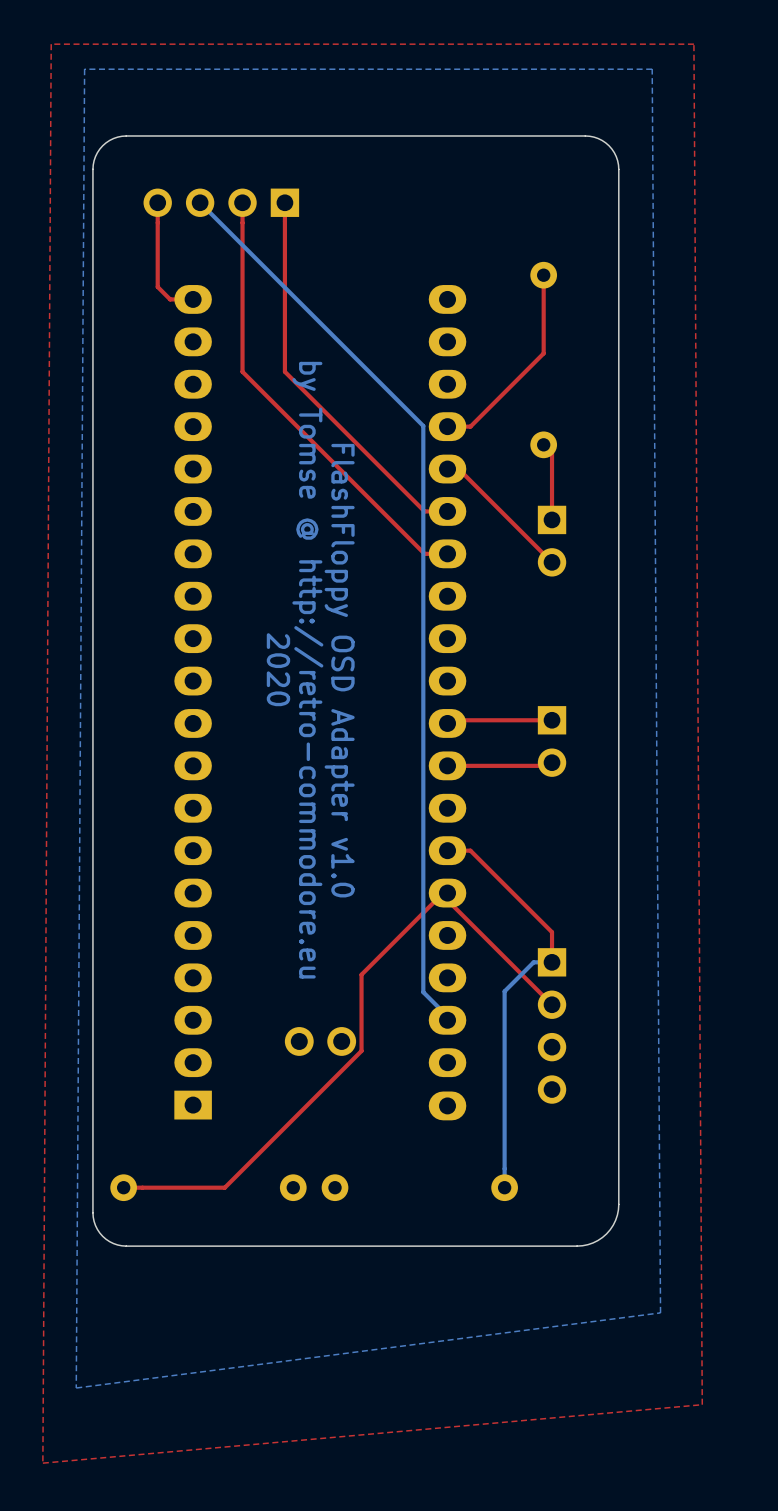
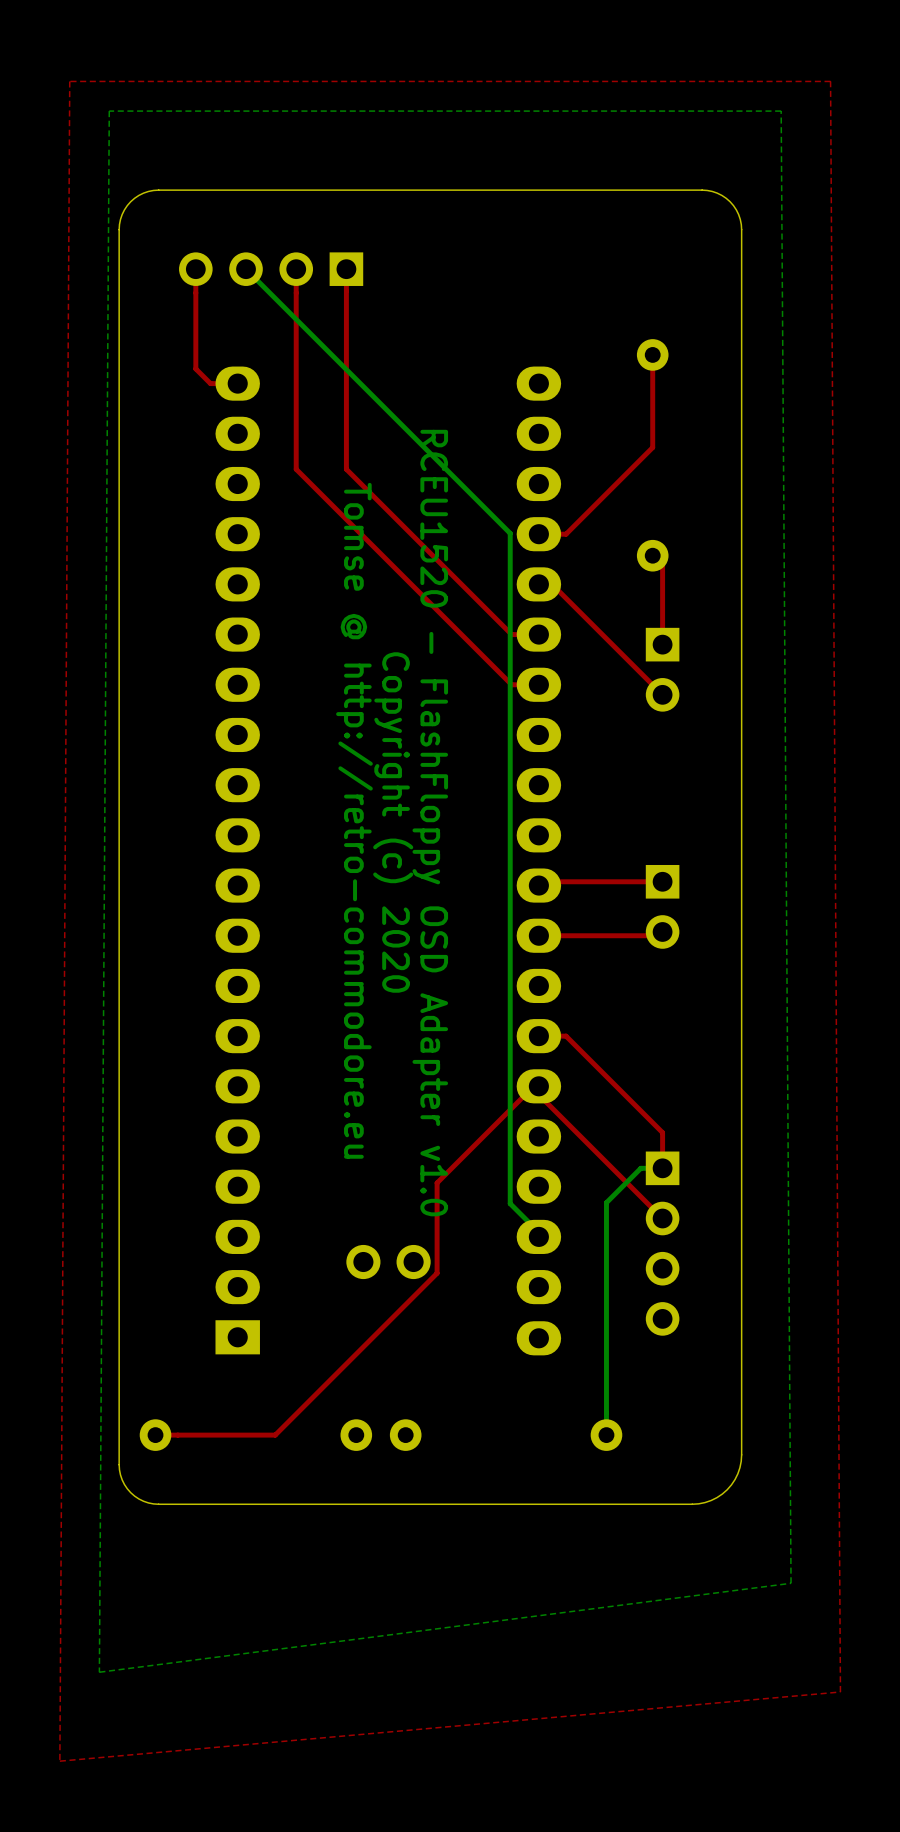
text: 2020 (278, 669) -> none
text: by Tomse @ http://retro-commodore.eu (307, 670) -> Tomse @ http://retro-commodore.eu (354, 820)
text: none -> Copyright (c) 2020 (393, 822)
text: FlashFloppy OSD Adapter v1.0 (339, 670) -> RCEU1520 - FlashFloppy OSD Adapter v1.0 (430, 823)

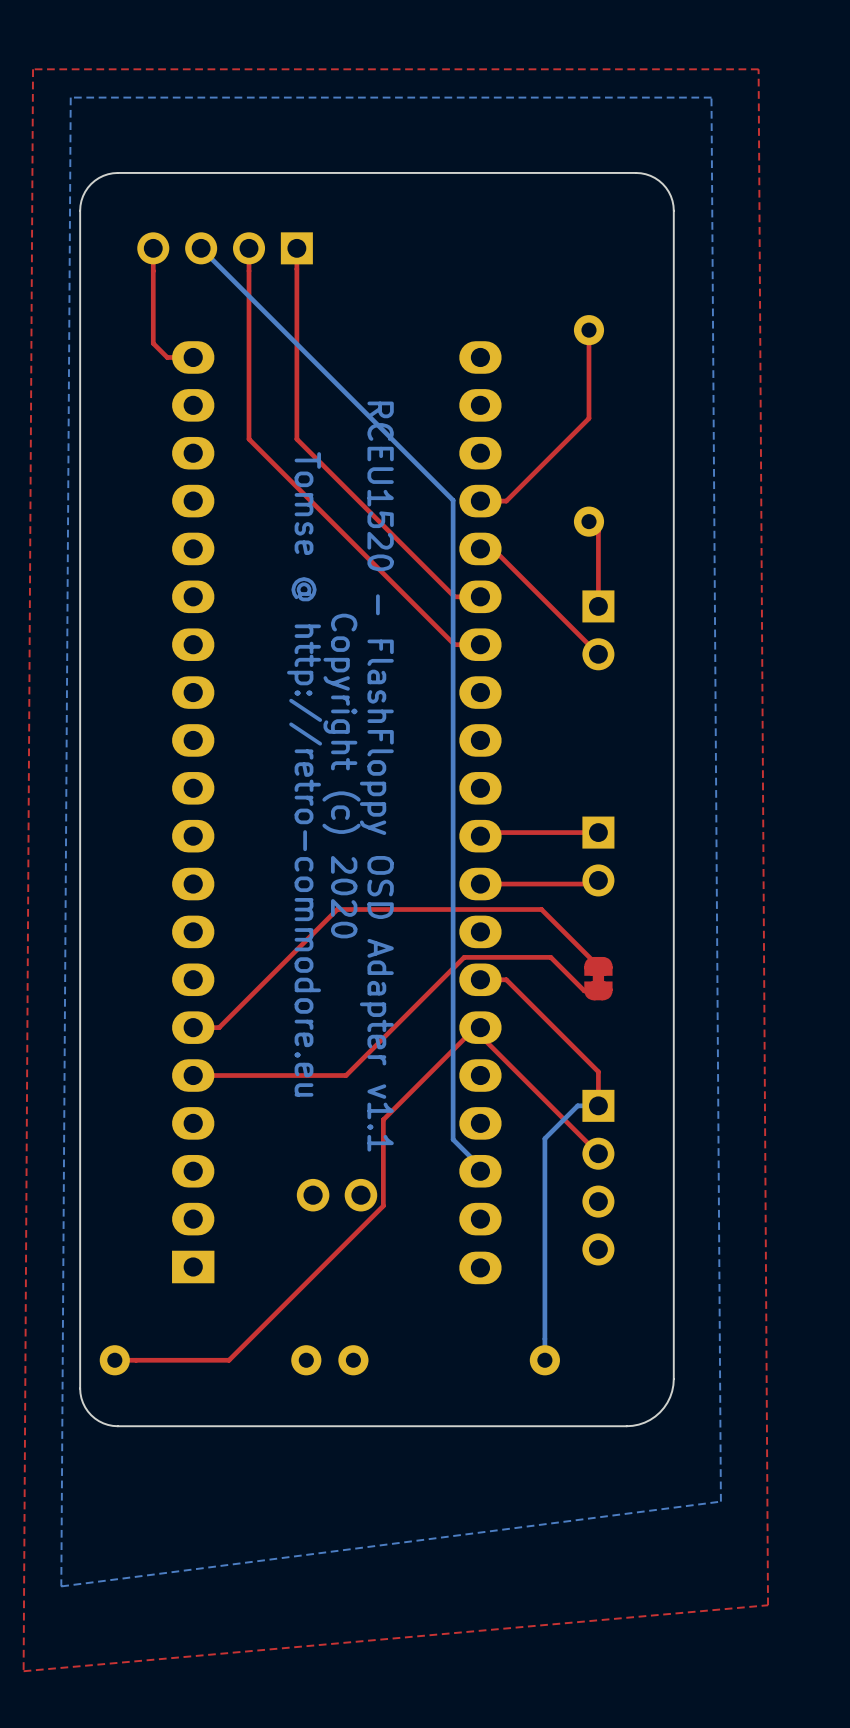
text: RCEU1520 - FlashFloppy OSD Adapter v1.0 (430, 823) -> RCEU1520 - FlashFloppy OSD Adapter v1.1 (376, 776)
top track: none -> (598, 966) (541, 909) (337, 909) (219, 1027) (193, 1027)
part: none -> (598, 978)
top track: none -> (598, 990) (584, 990) (550, 957) (464, 957) (346, 1075) (193, 1075)

